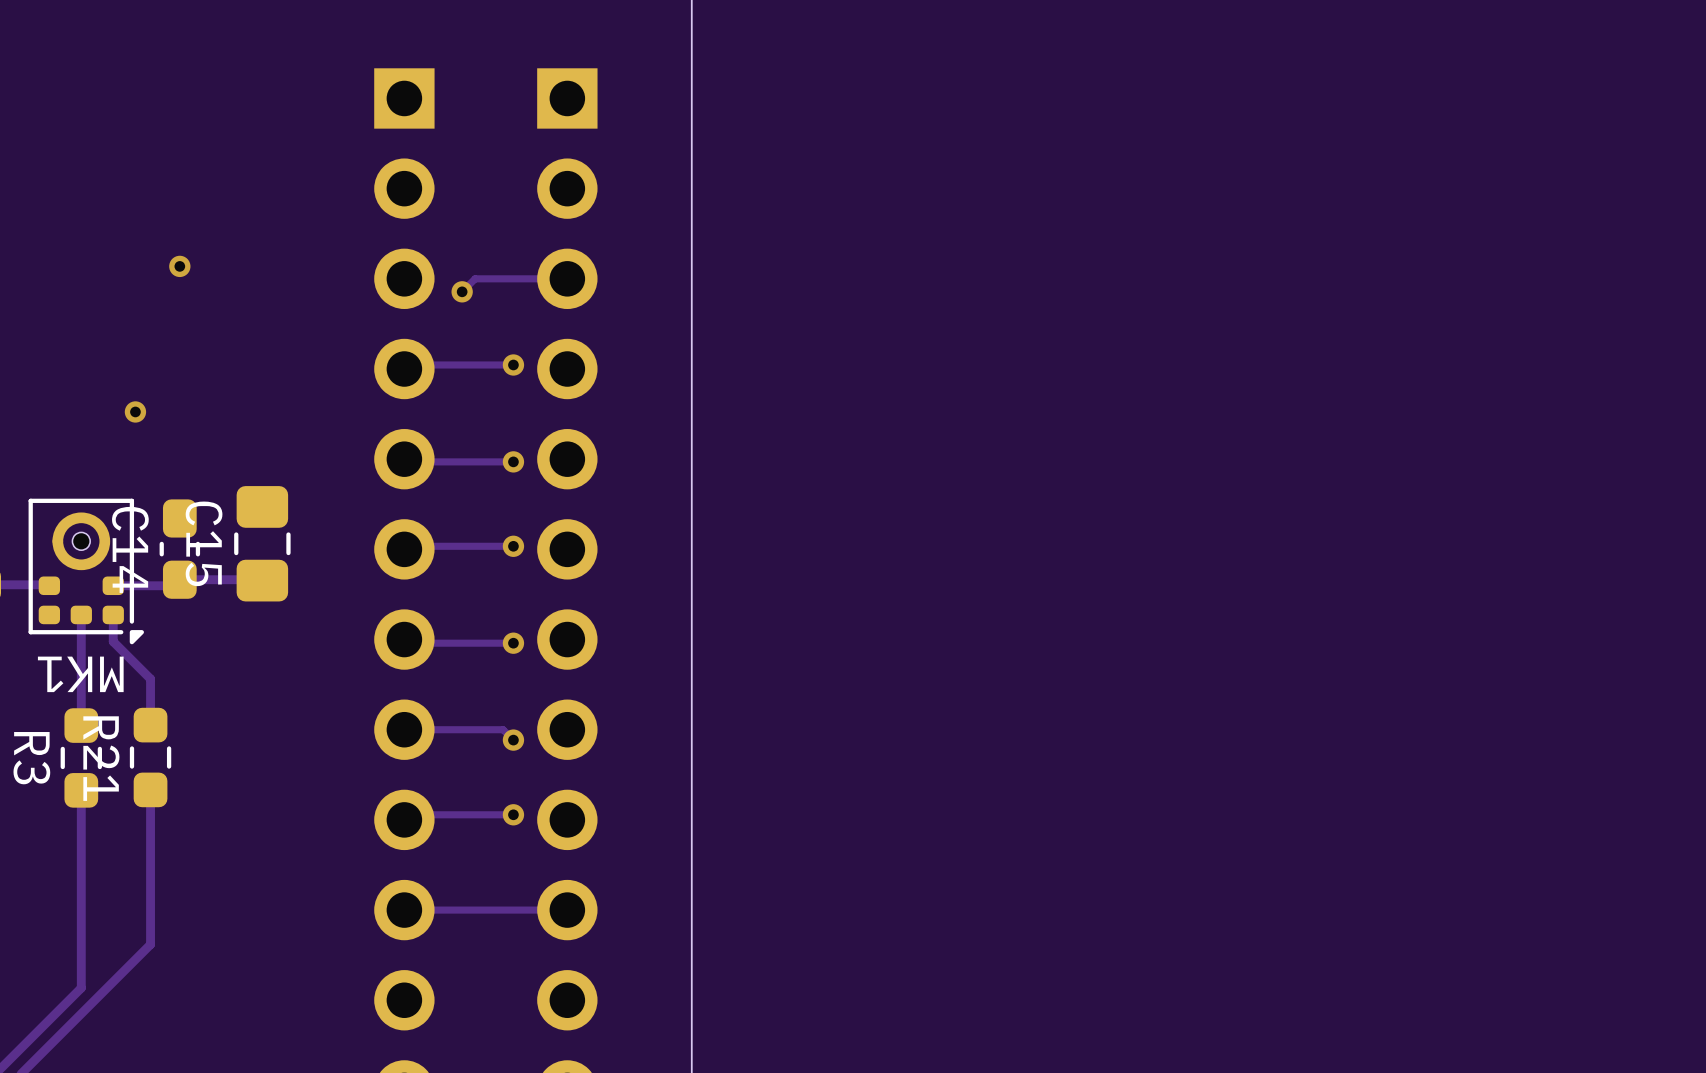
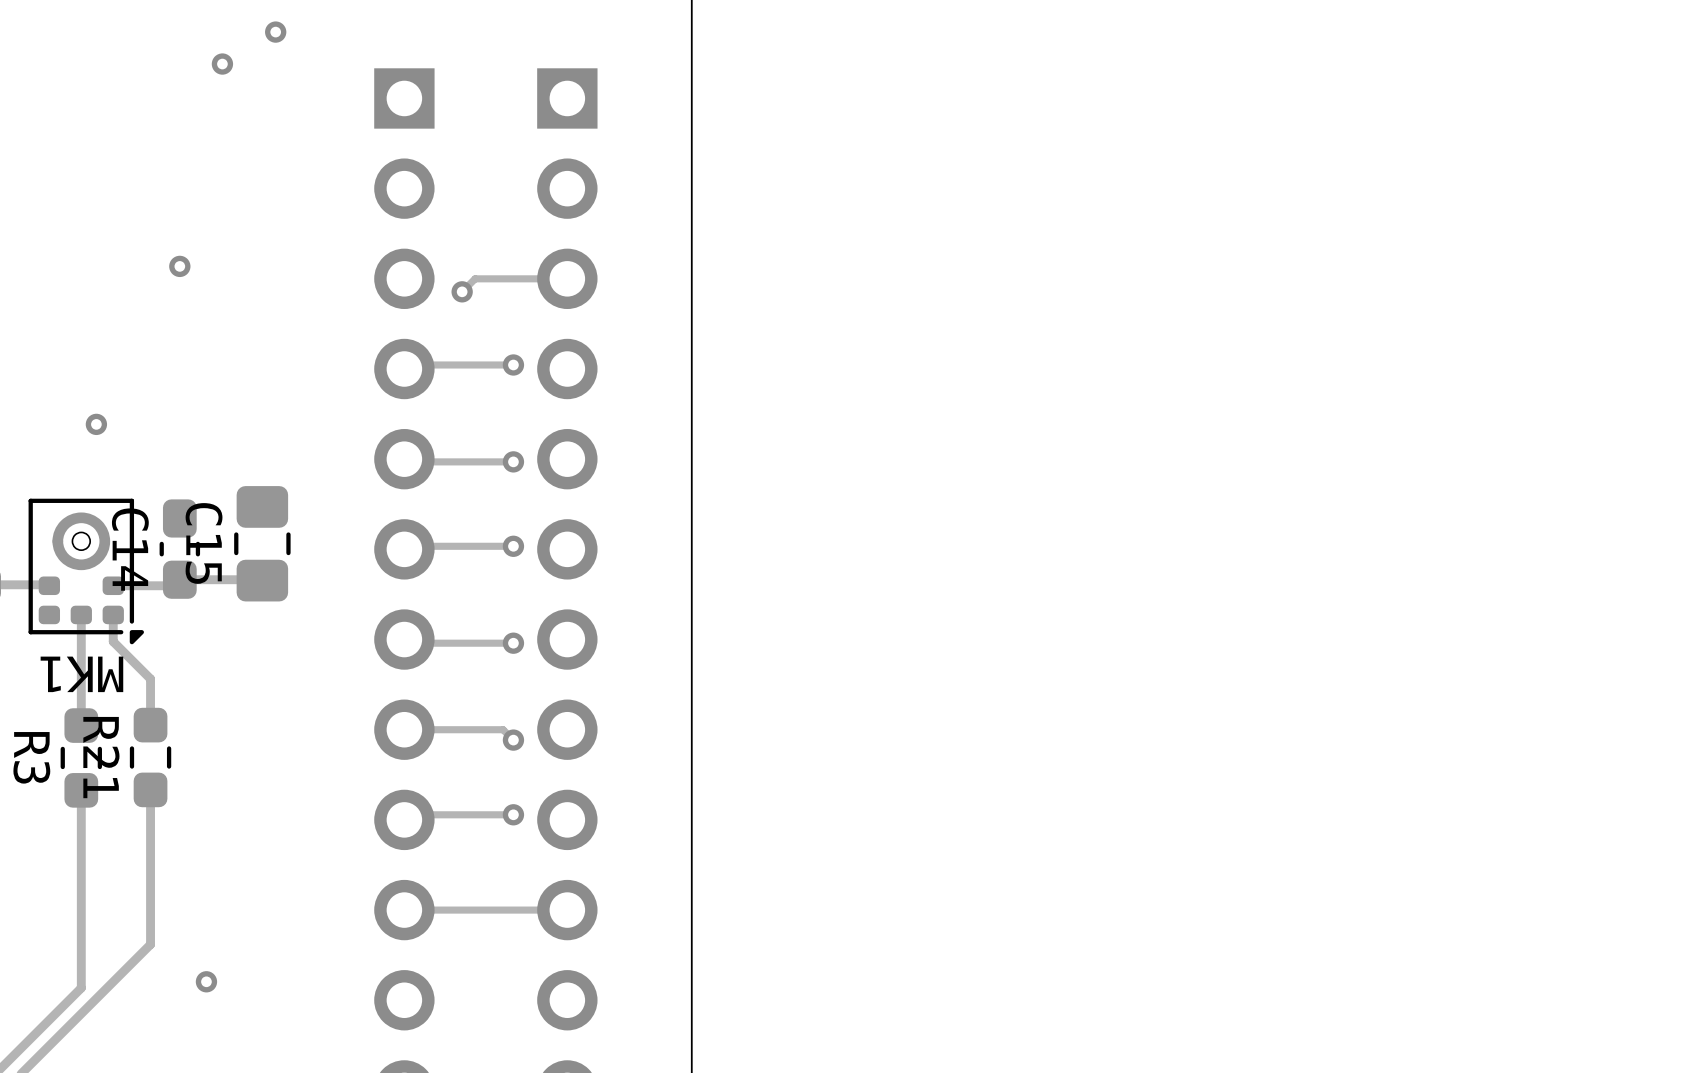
via: none -> (275, 32)
via: none -> (222, 64)
via position: (135, 411) -> (96, 424)
via: none -> (206, 981)

